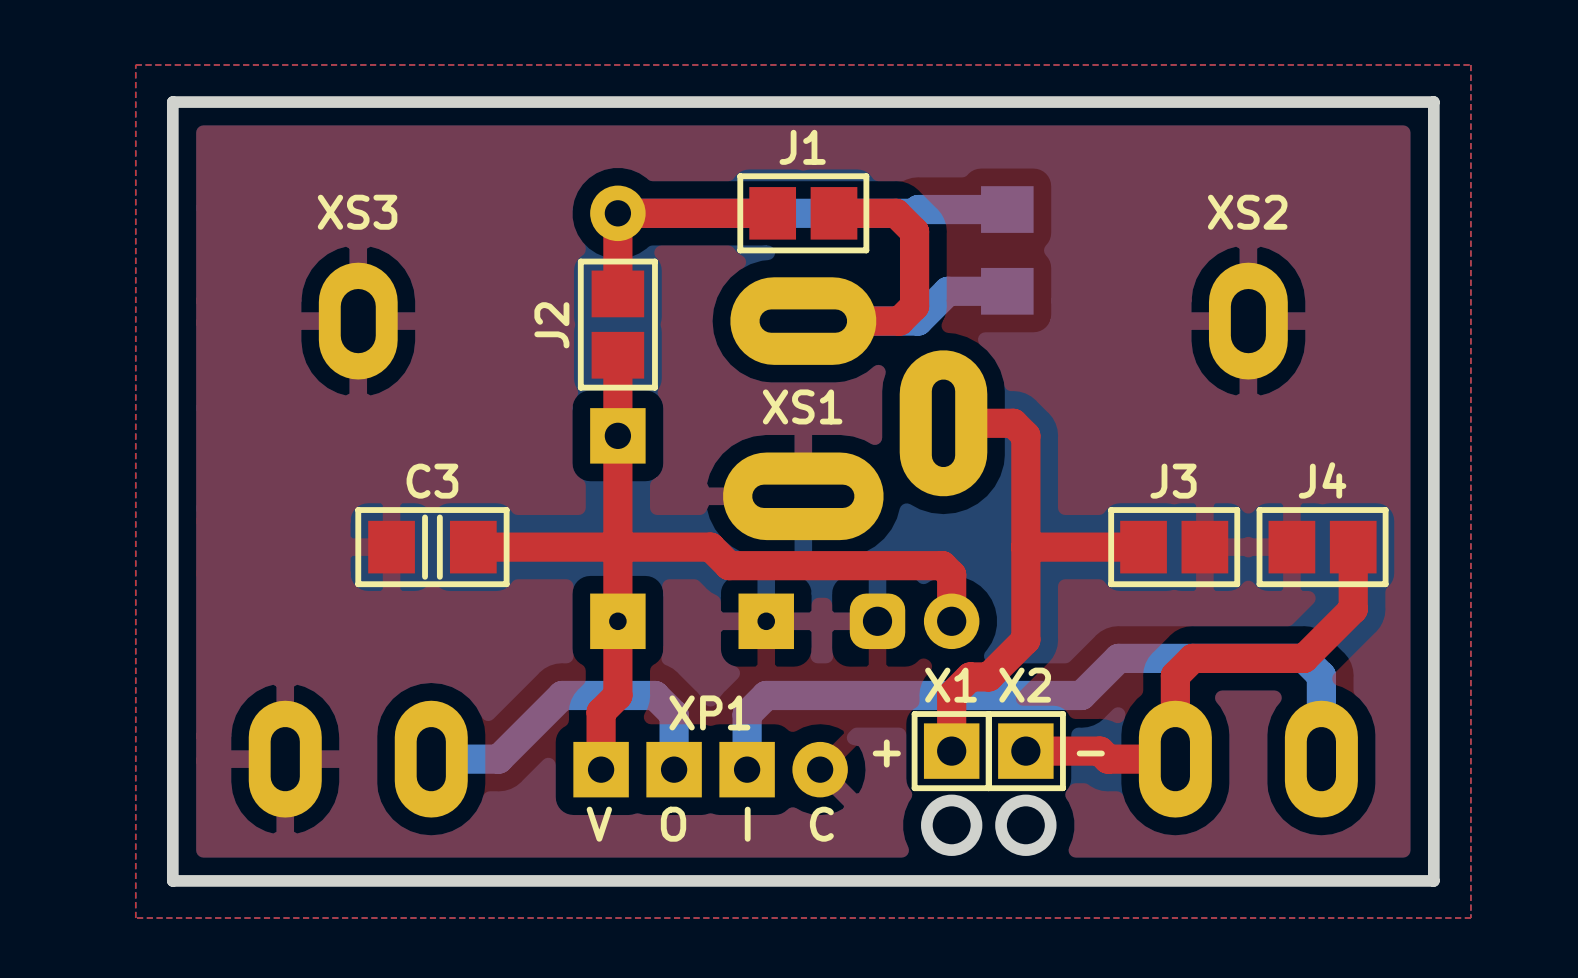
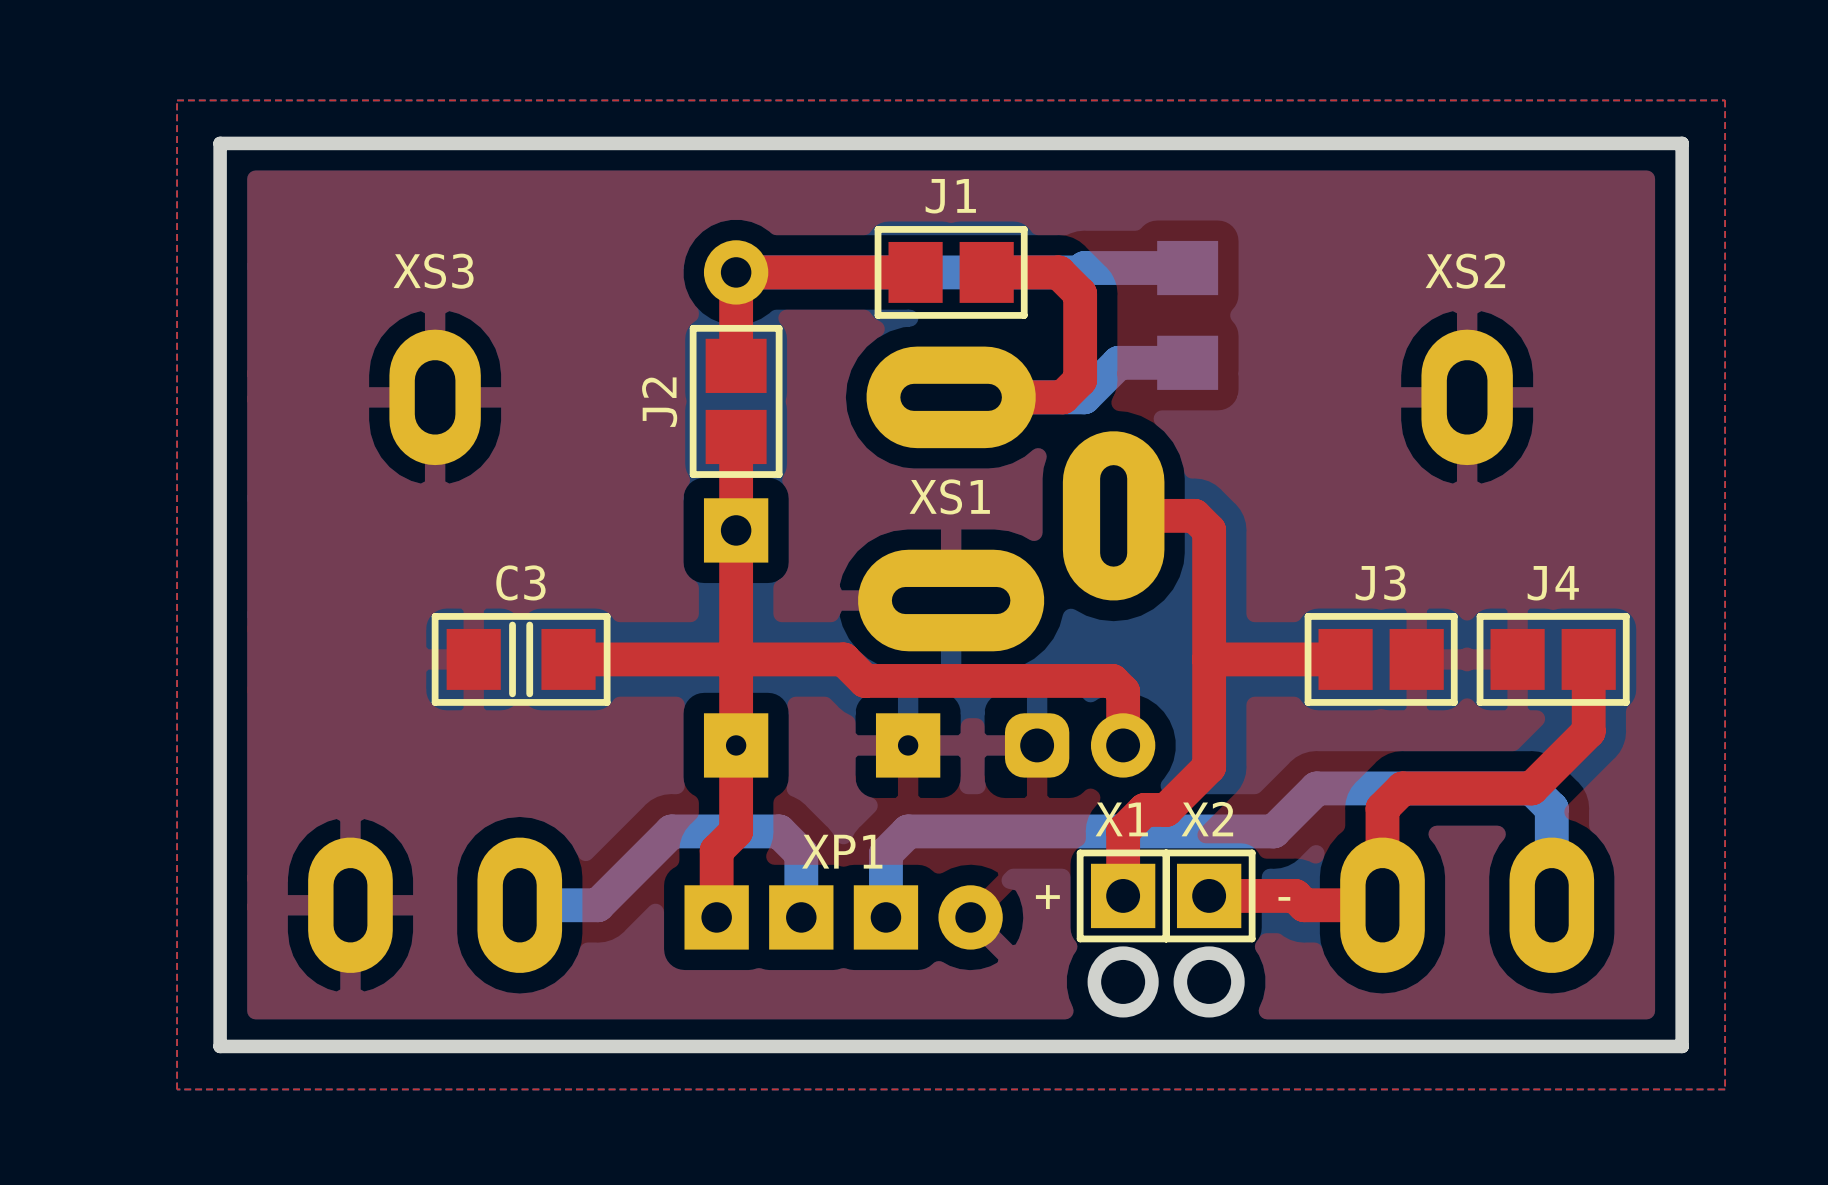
text: V (599, 824) -> none
text: O (673, 824) -> none
text: I (747, 824) -> none
text: C (821, 824) -> none

